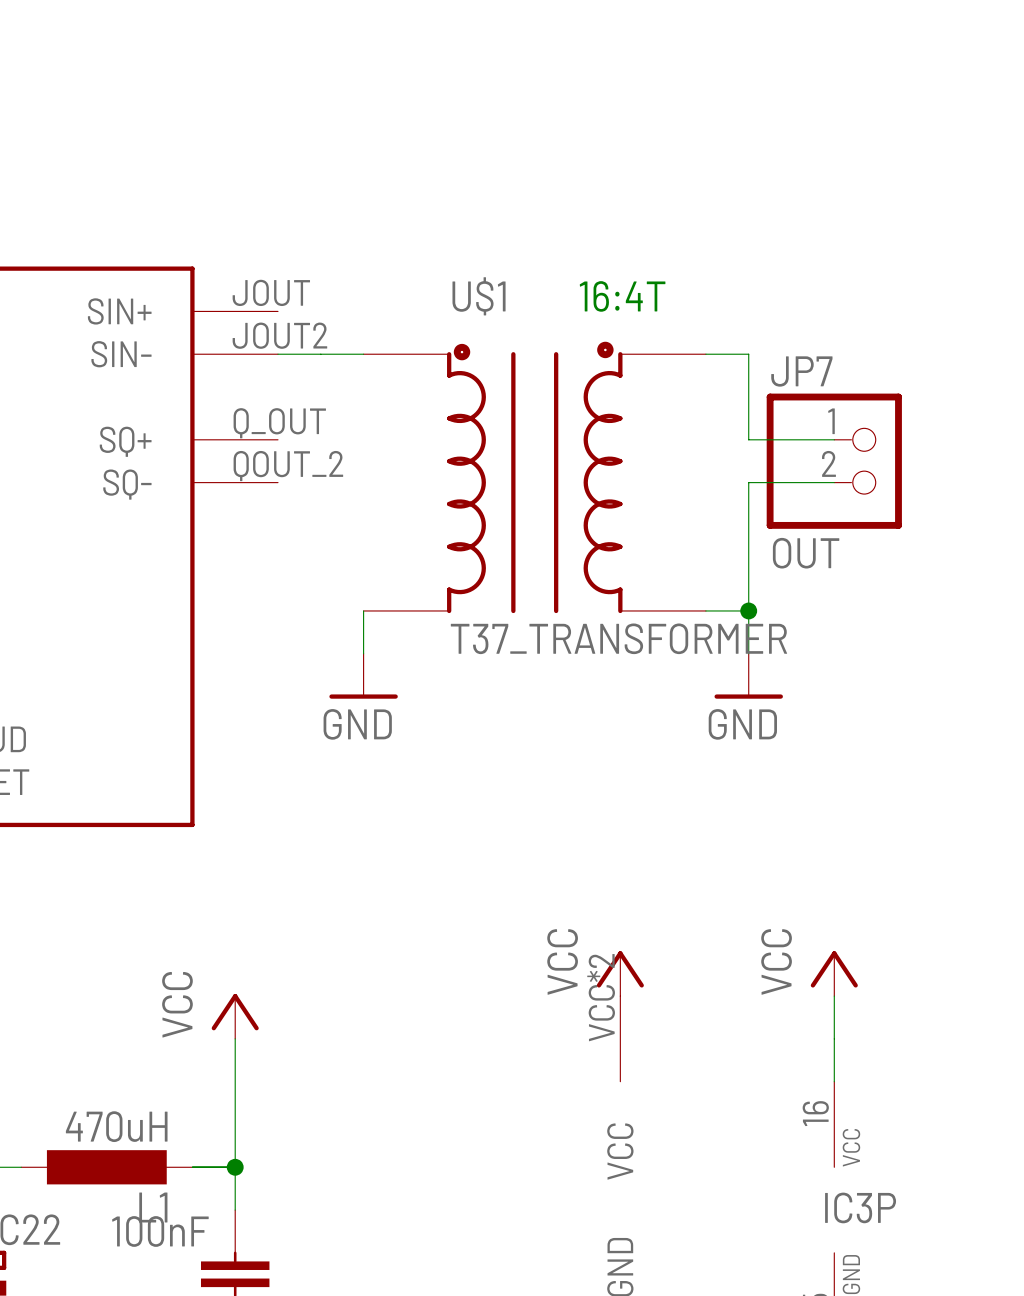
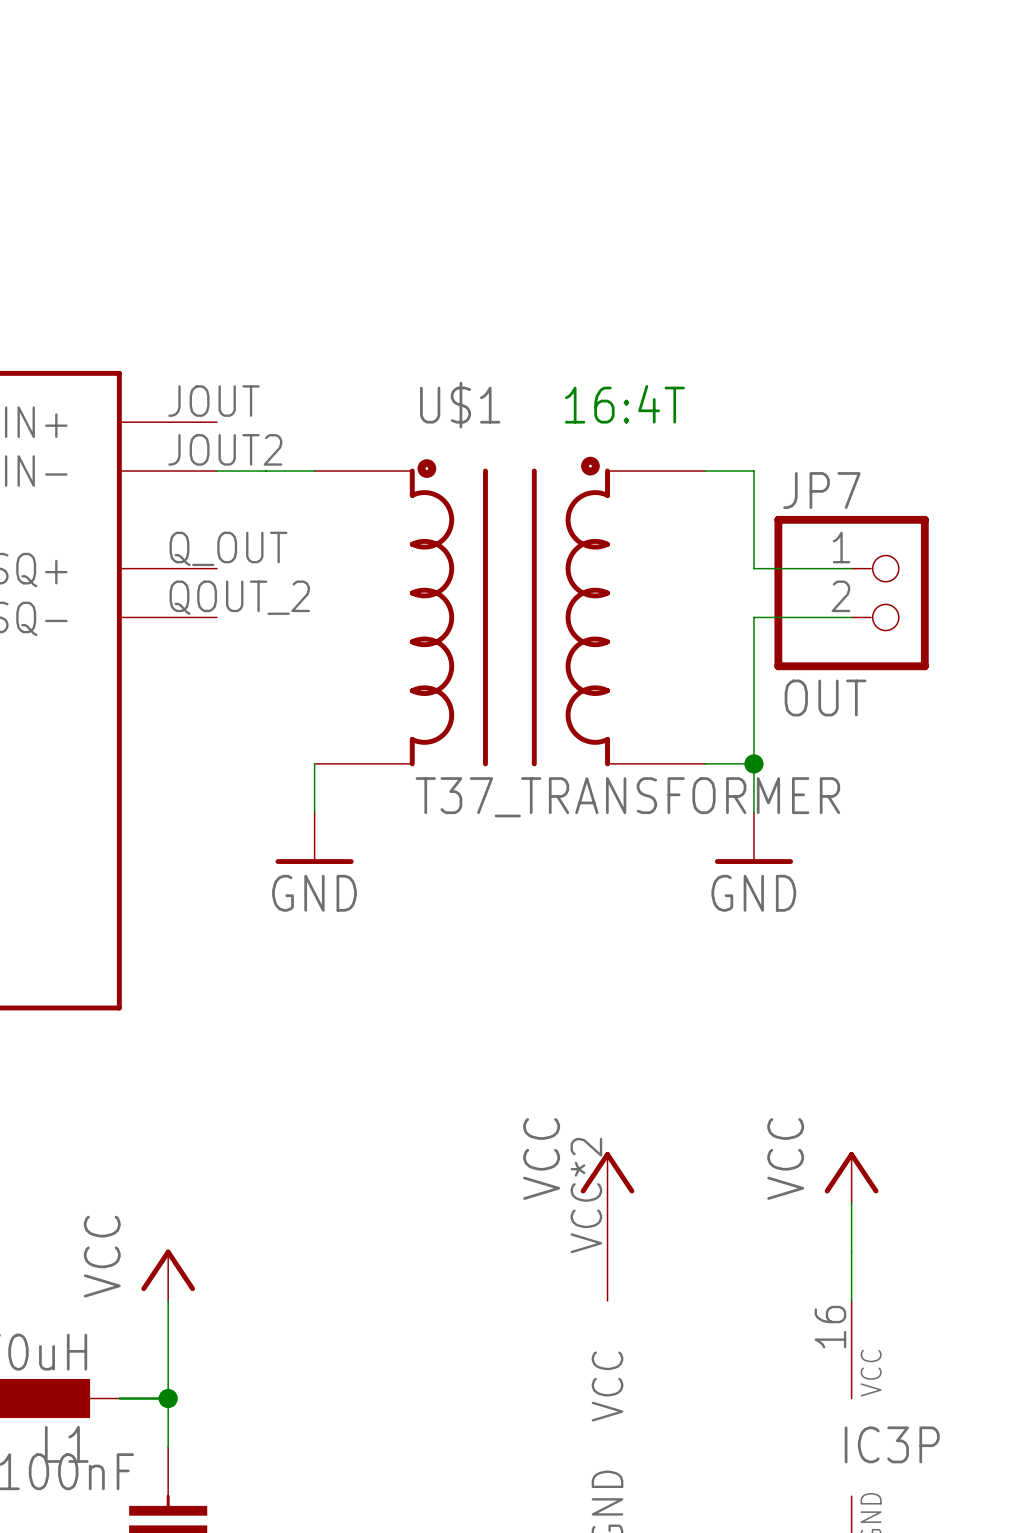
power symbol position: VCC (235, 1016) -> VCC (168, 1275)

